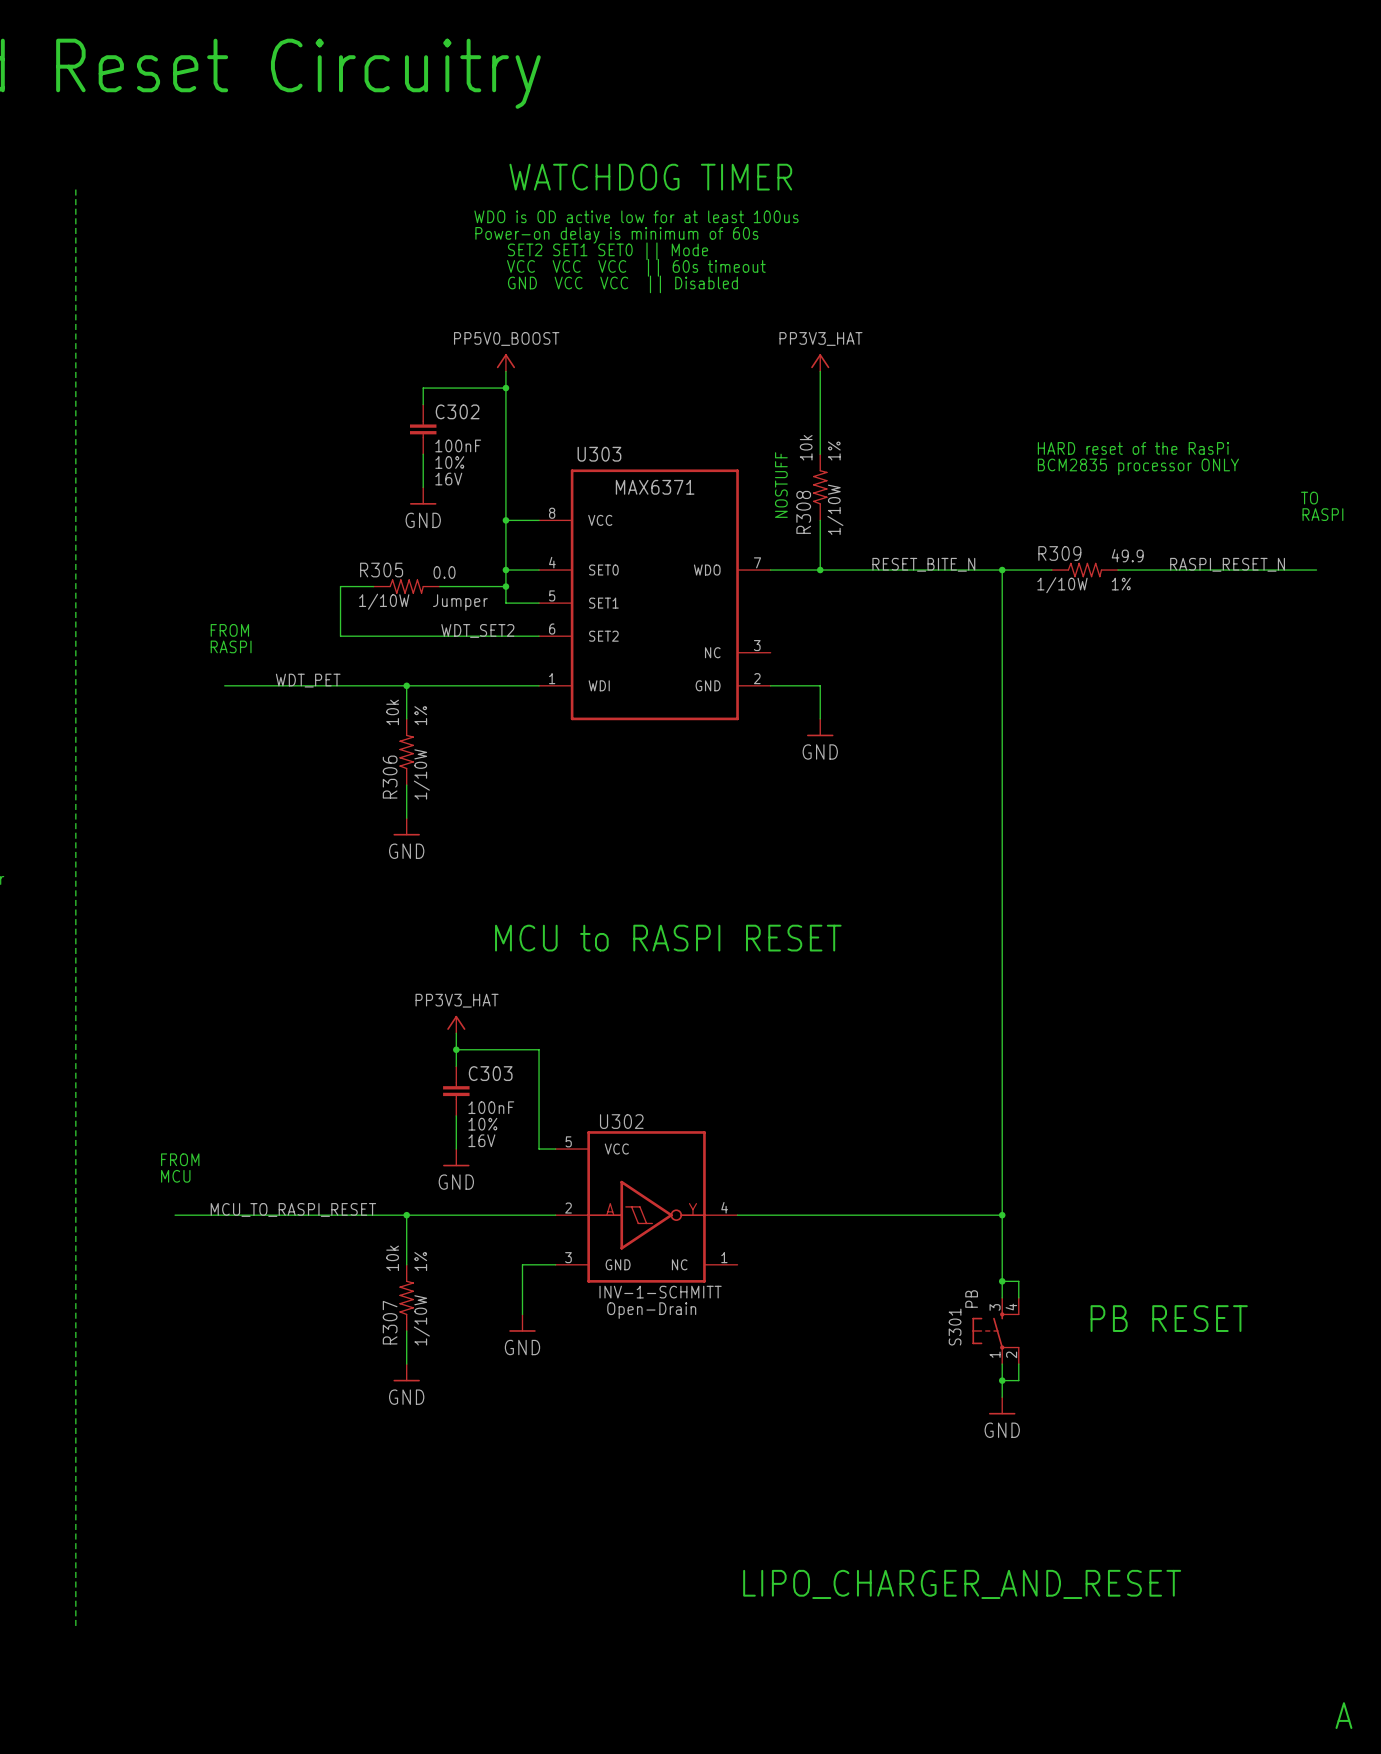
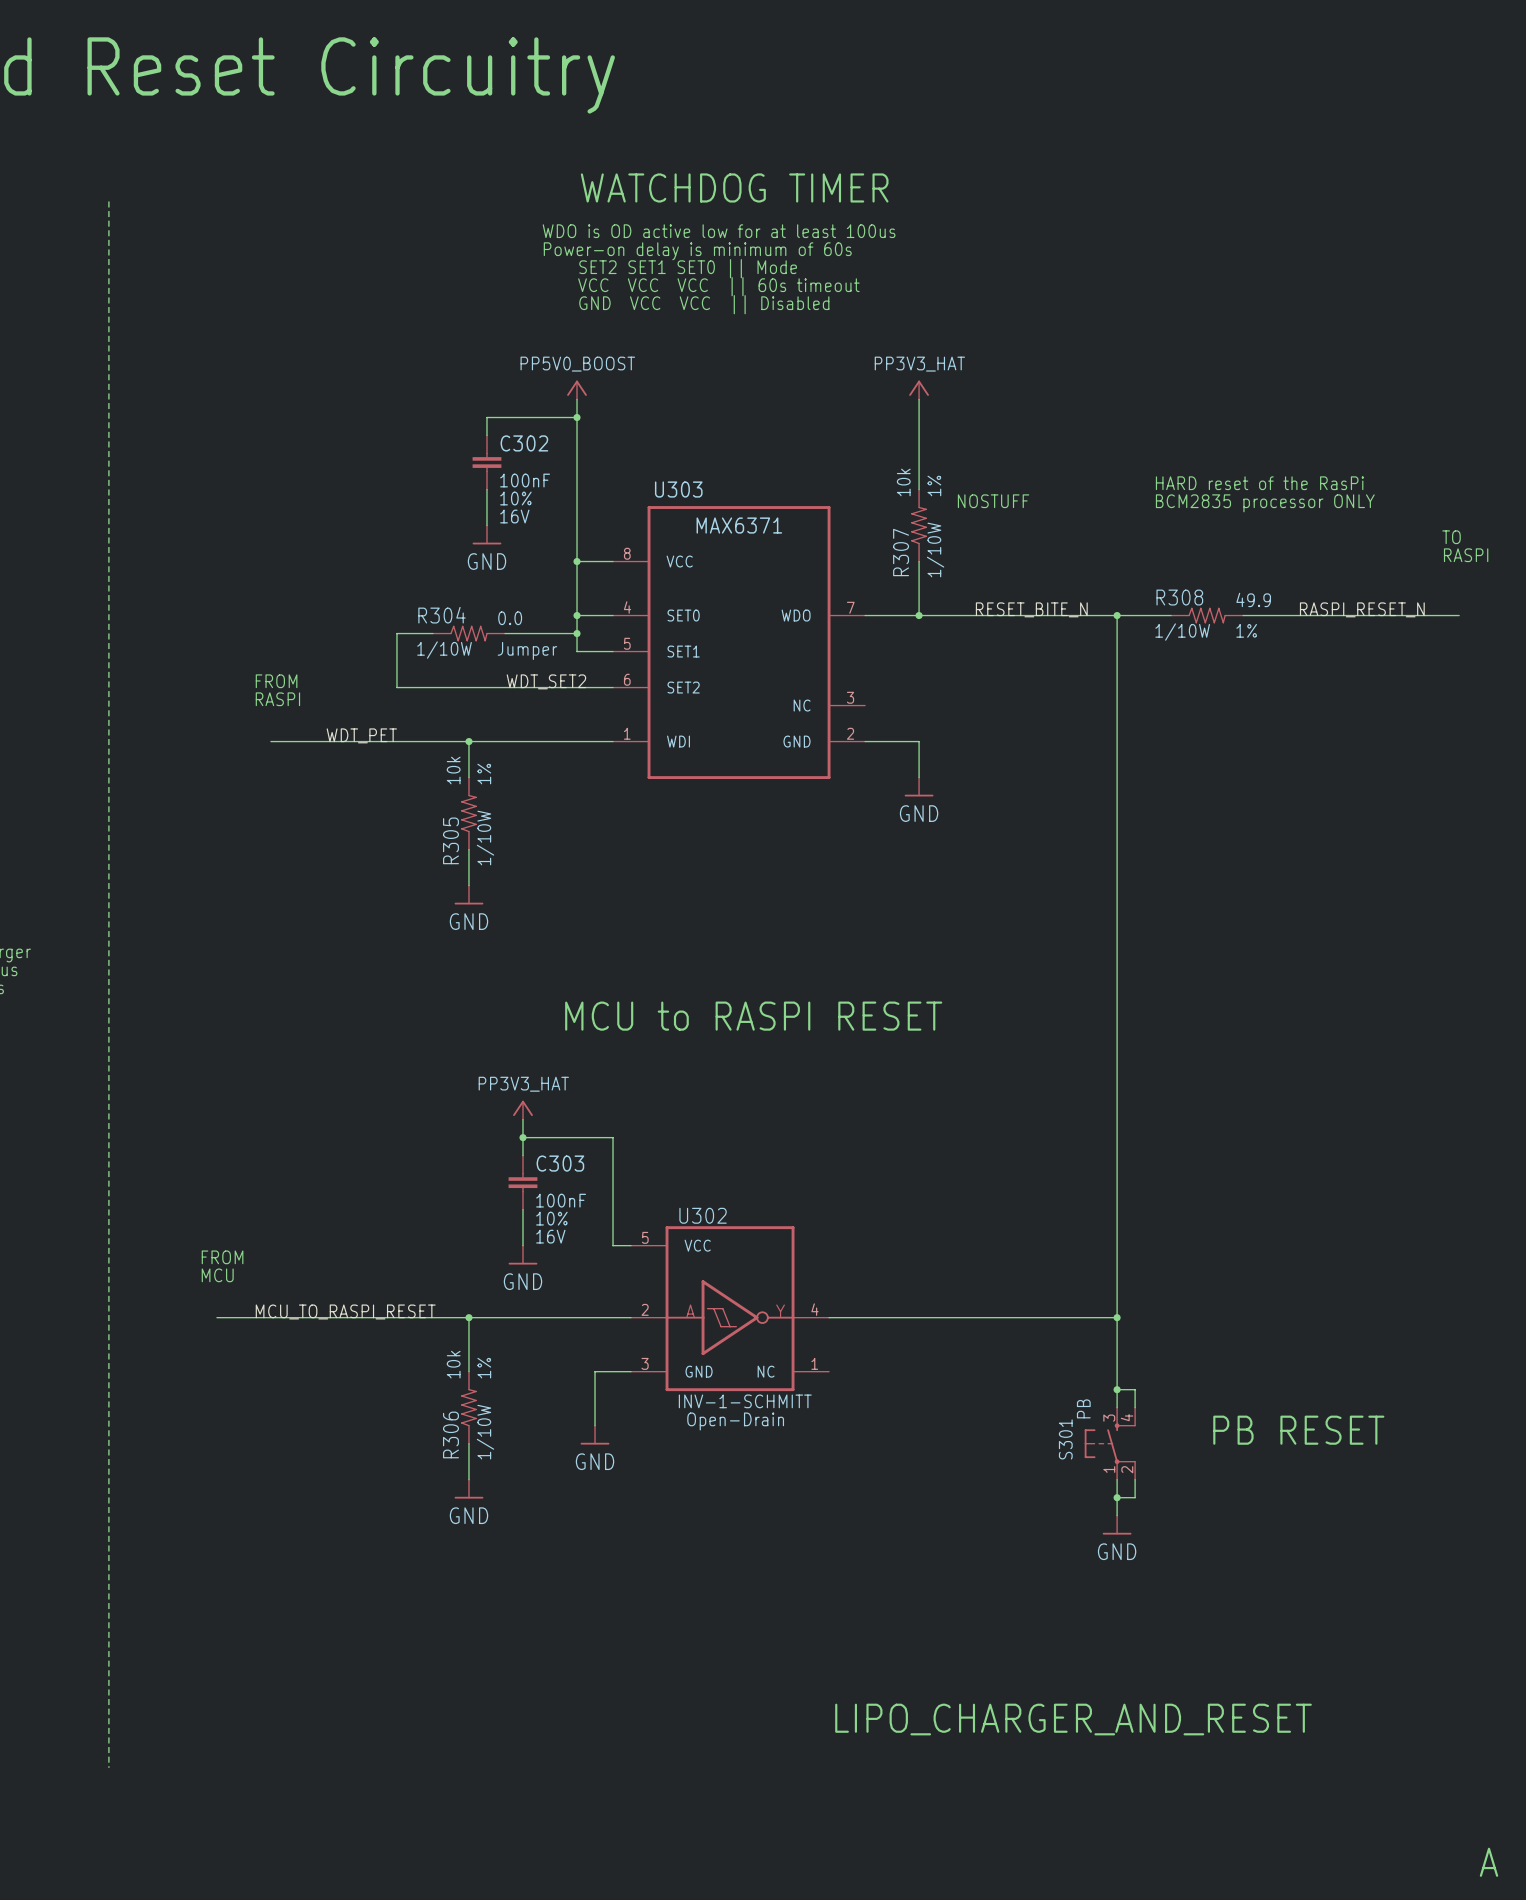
text rotation: 0° (781, 485) -> 90° clockwise (993, 501)
text position: NOSTUFF (781, 485) -> NOSTUFF (993, 501)
R308 name: R308 (803, 512) -> R307 (901, 552)
R309 name: R309 (1059, 553) -> R308 (1179, 597)
R305 name: R305 (381, 570) -> R304 (442, 615)
R306 name: R306 (390, 777) -> R305 (450, 840)
R307 name: R307 (390, 1322) -> R306 (450, 1434)

